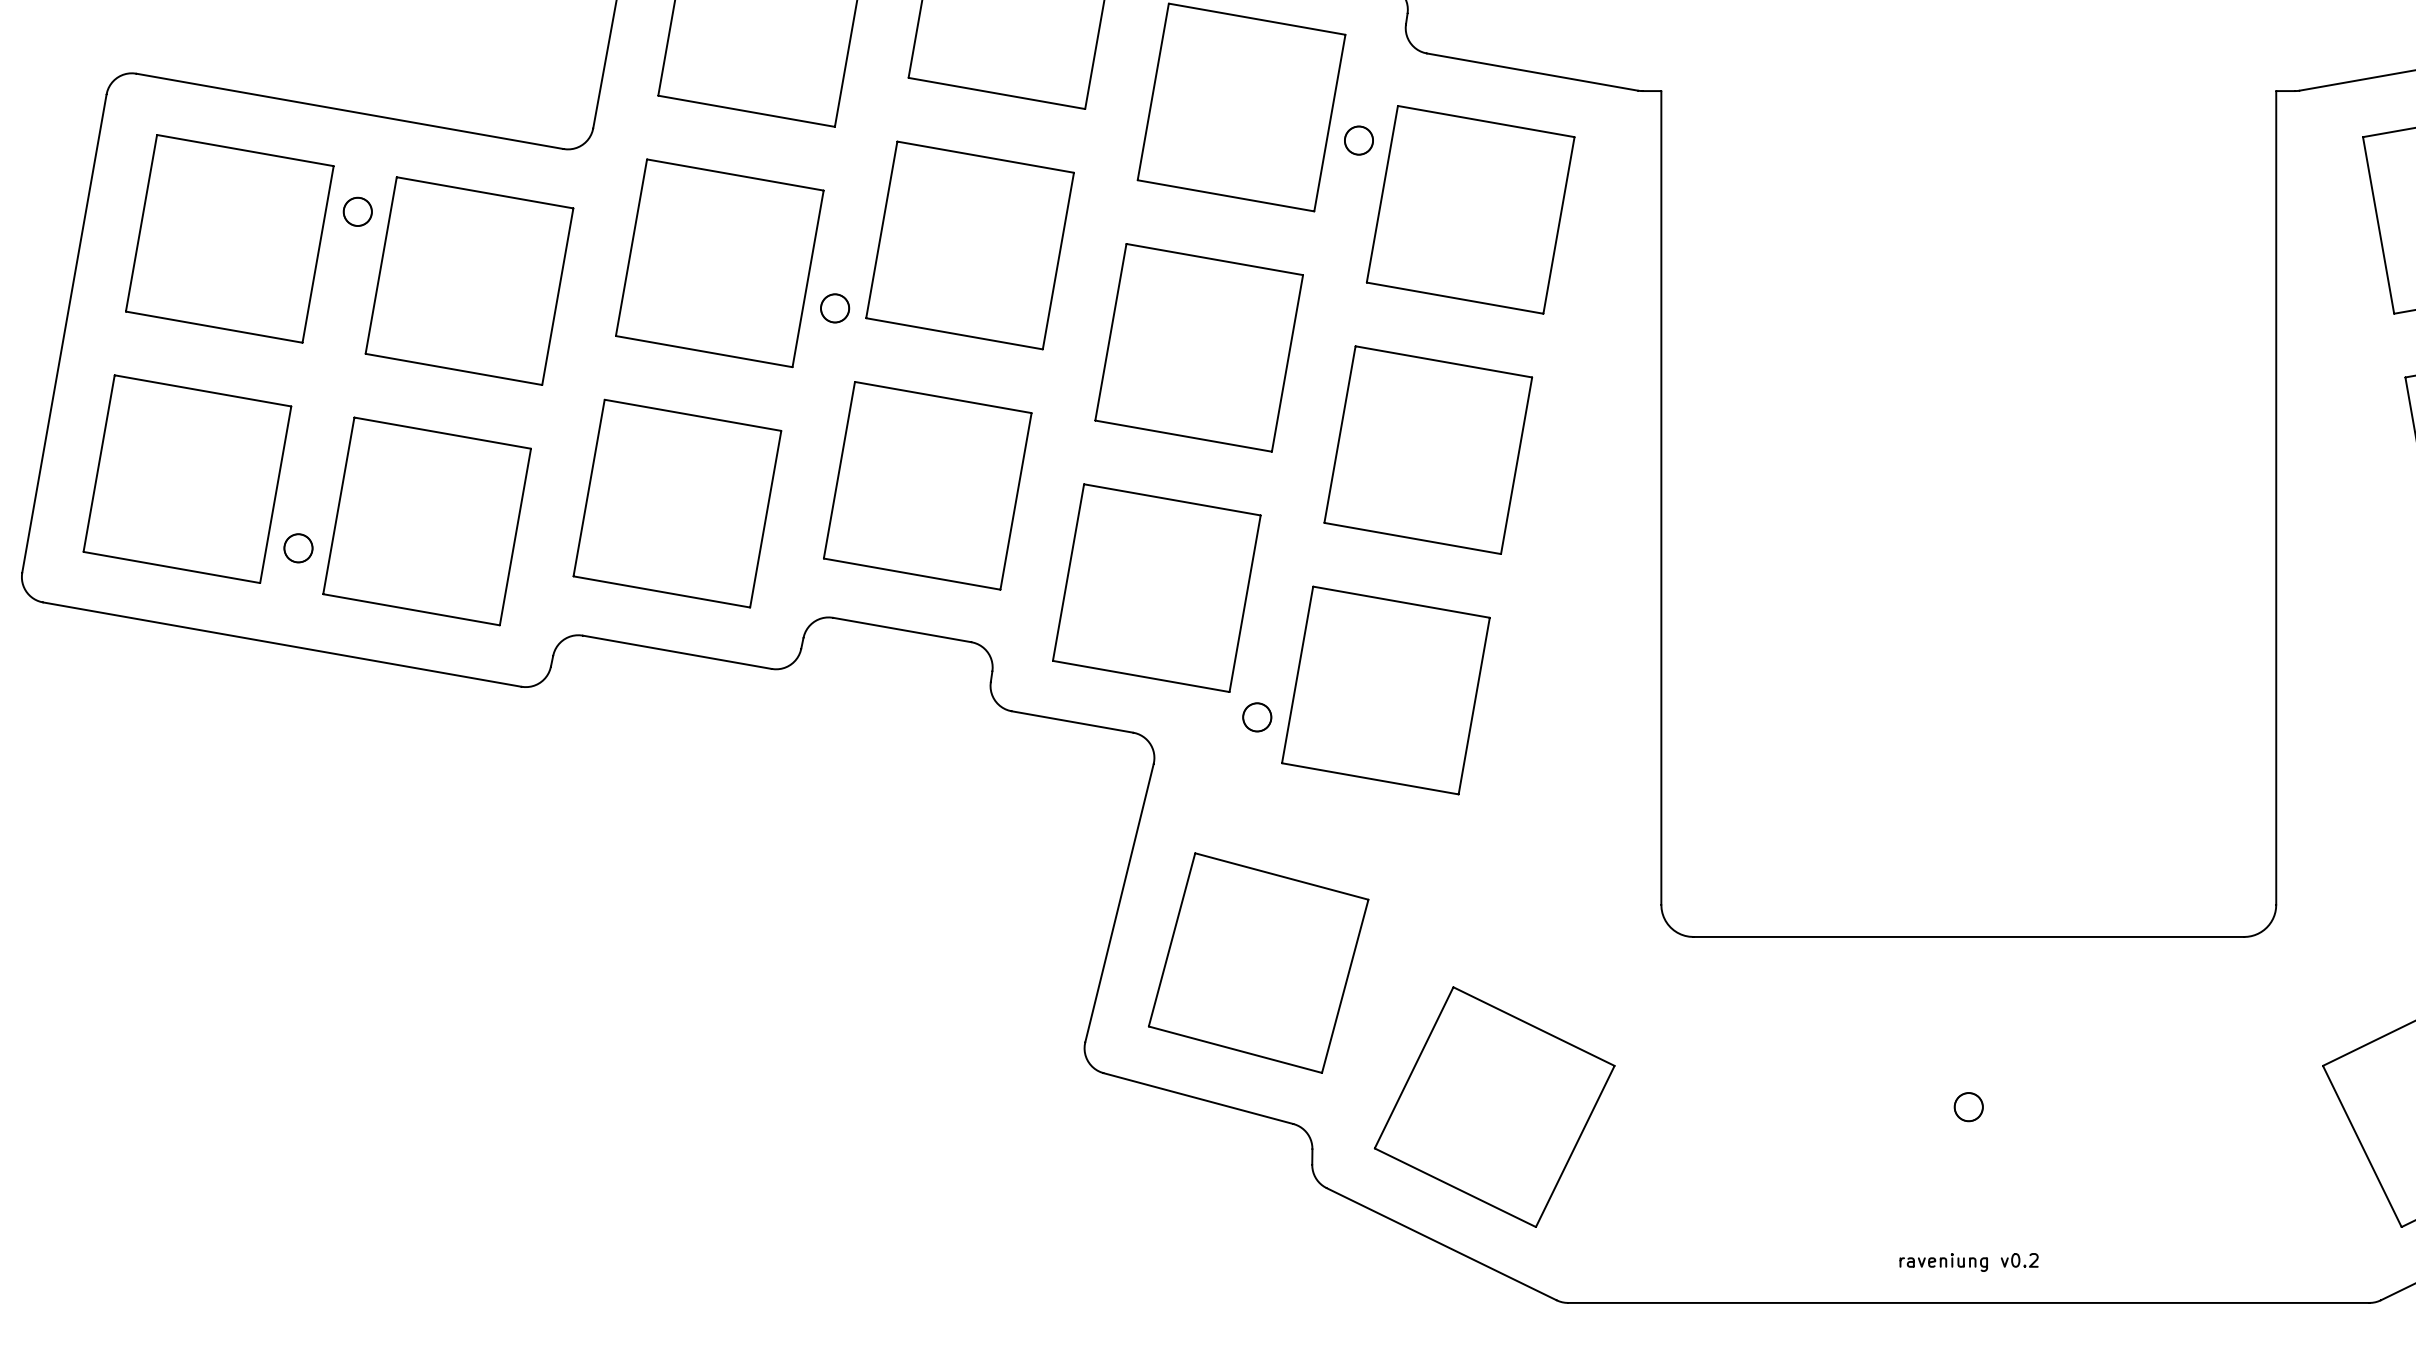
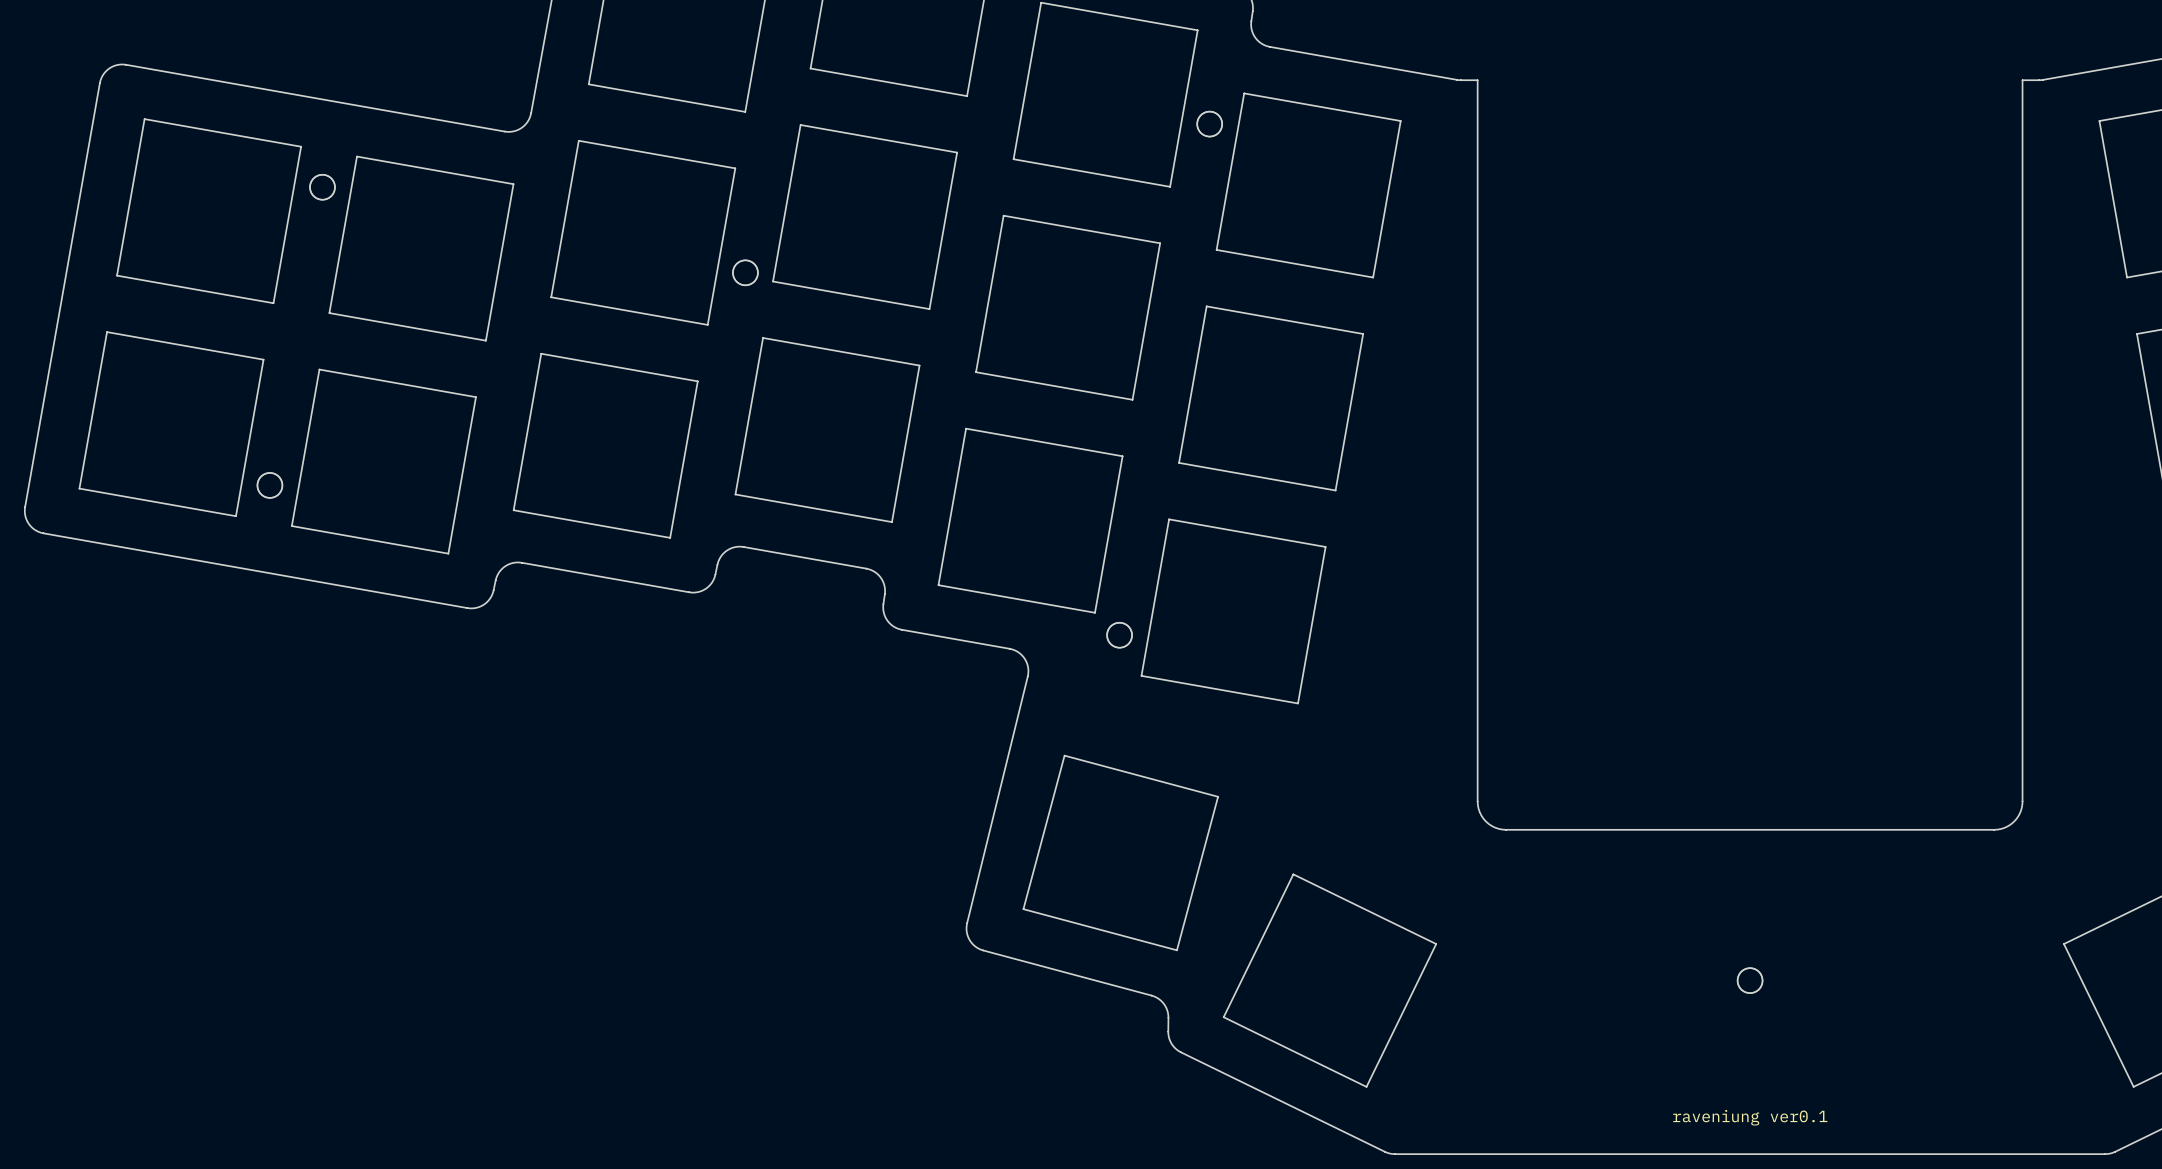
text: raveniung v0.2 (1969, 1262) -> raveniung ver0.1 (1750, 1117)

